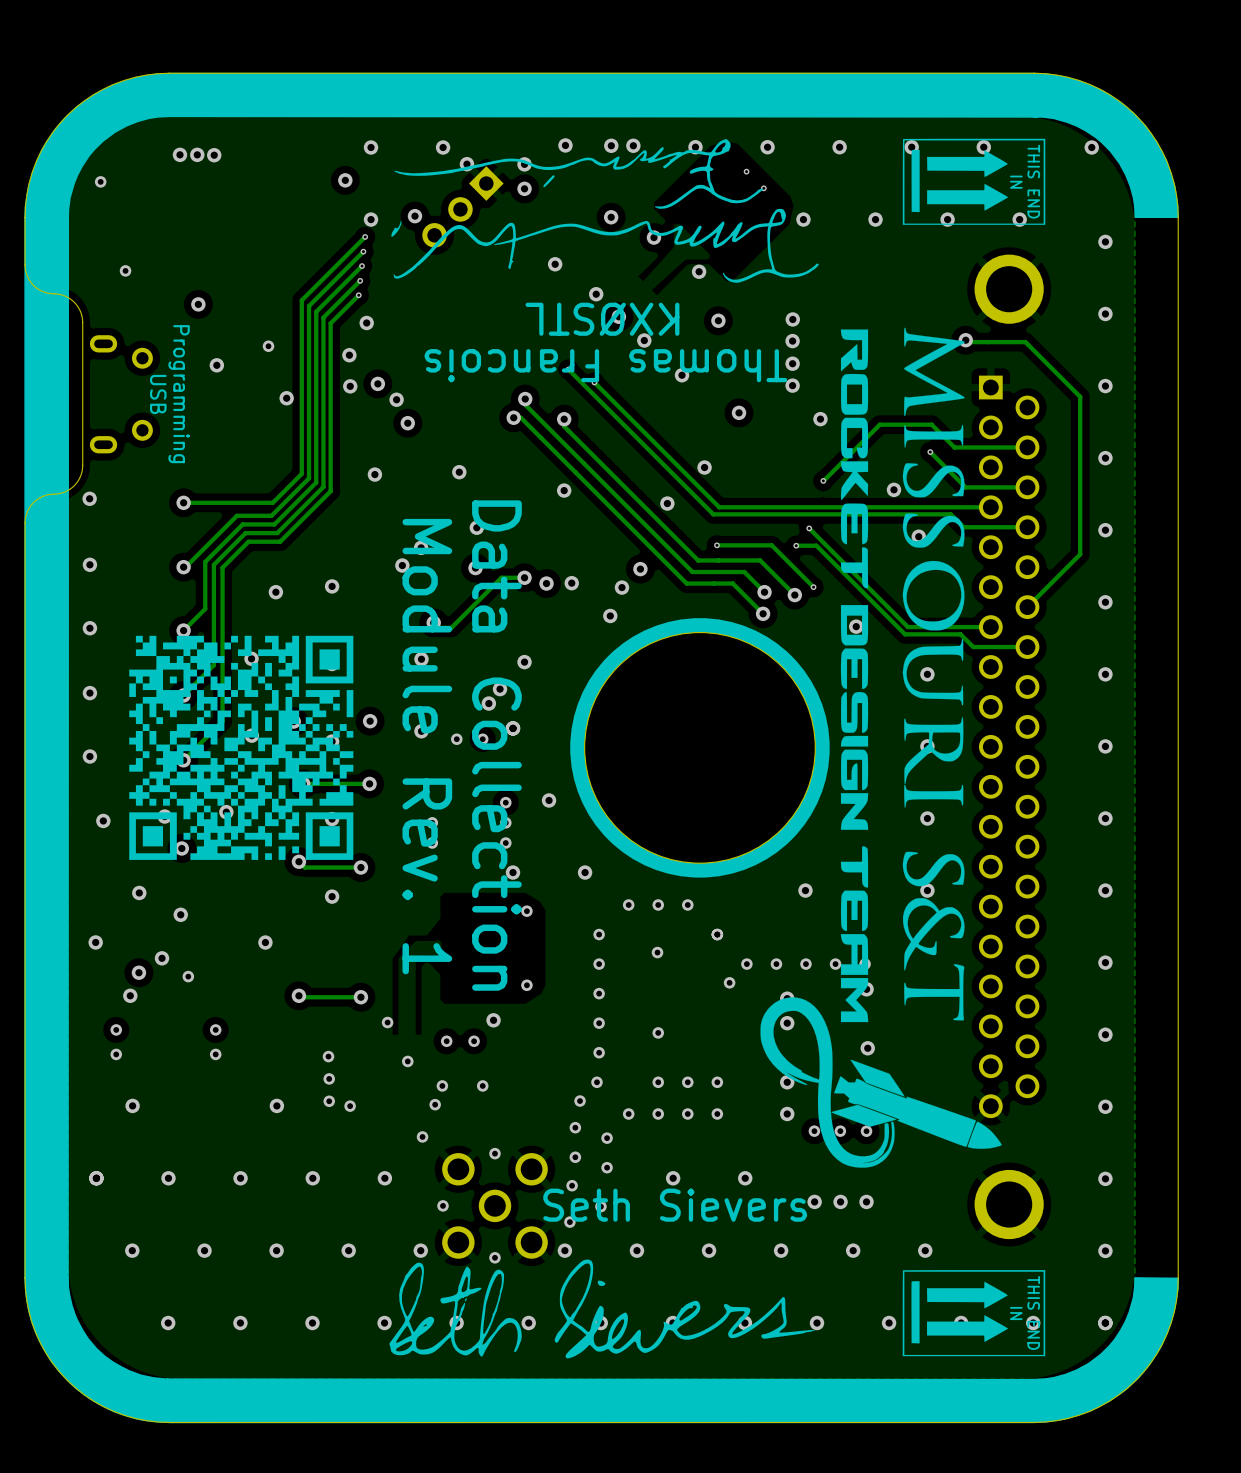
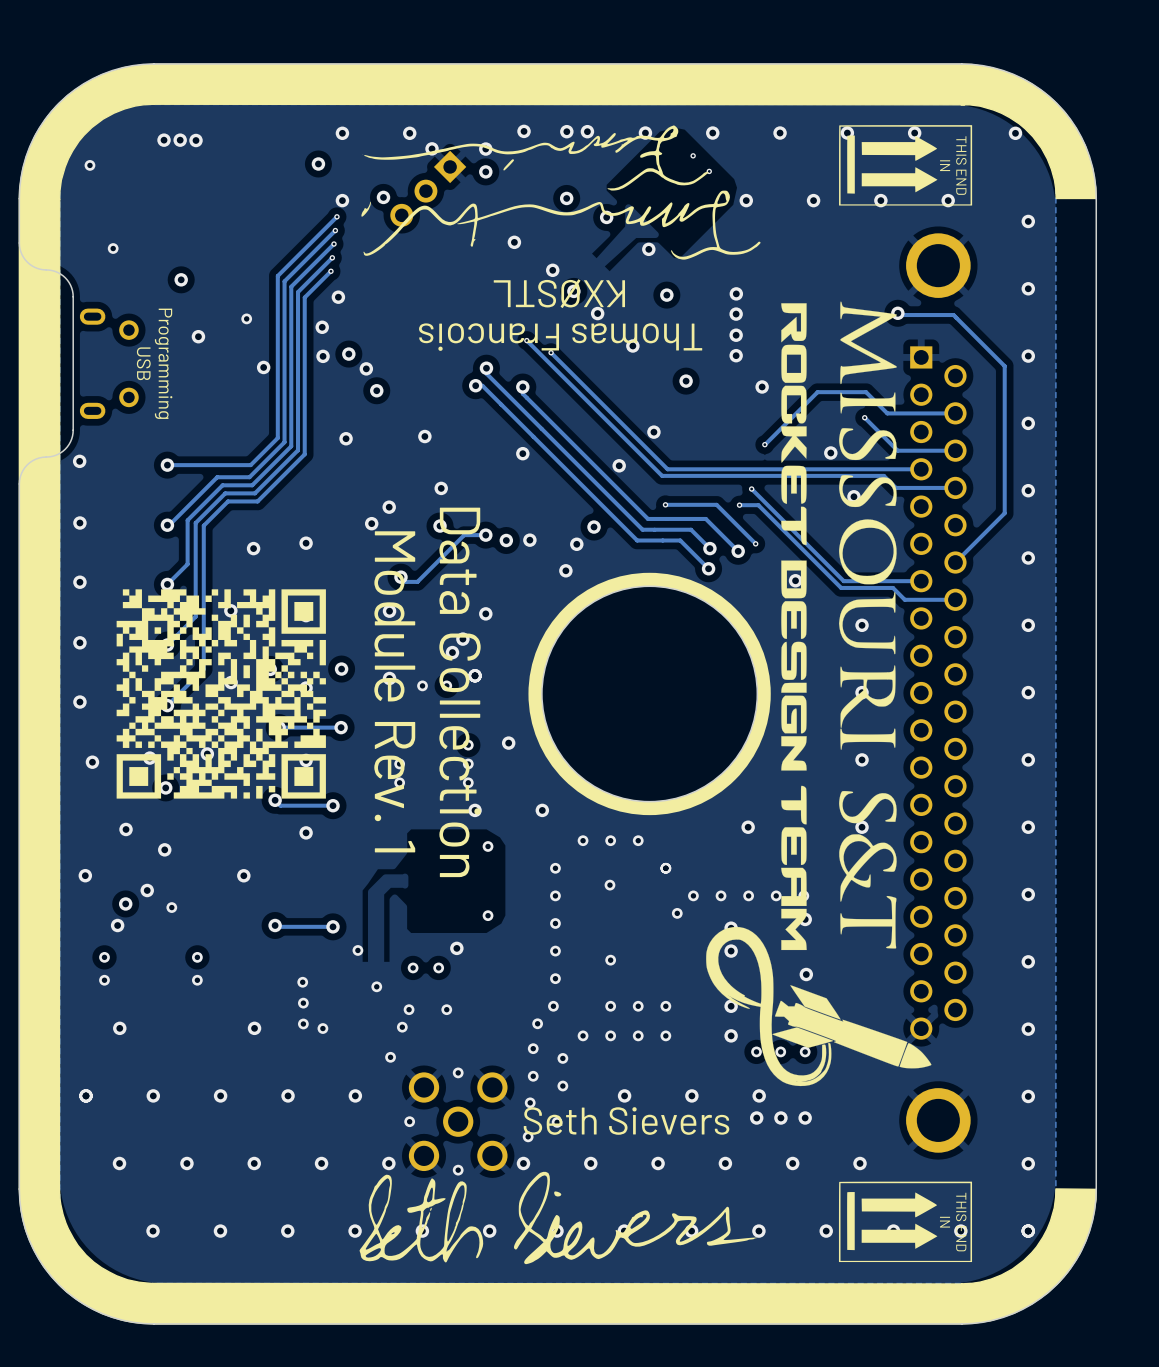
via: none -> (759, 1095)

